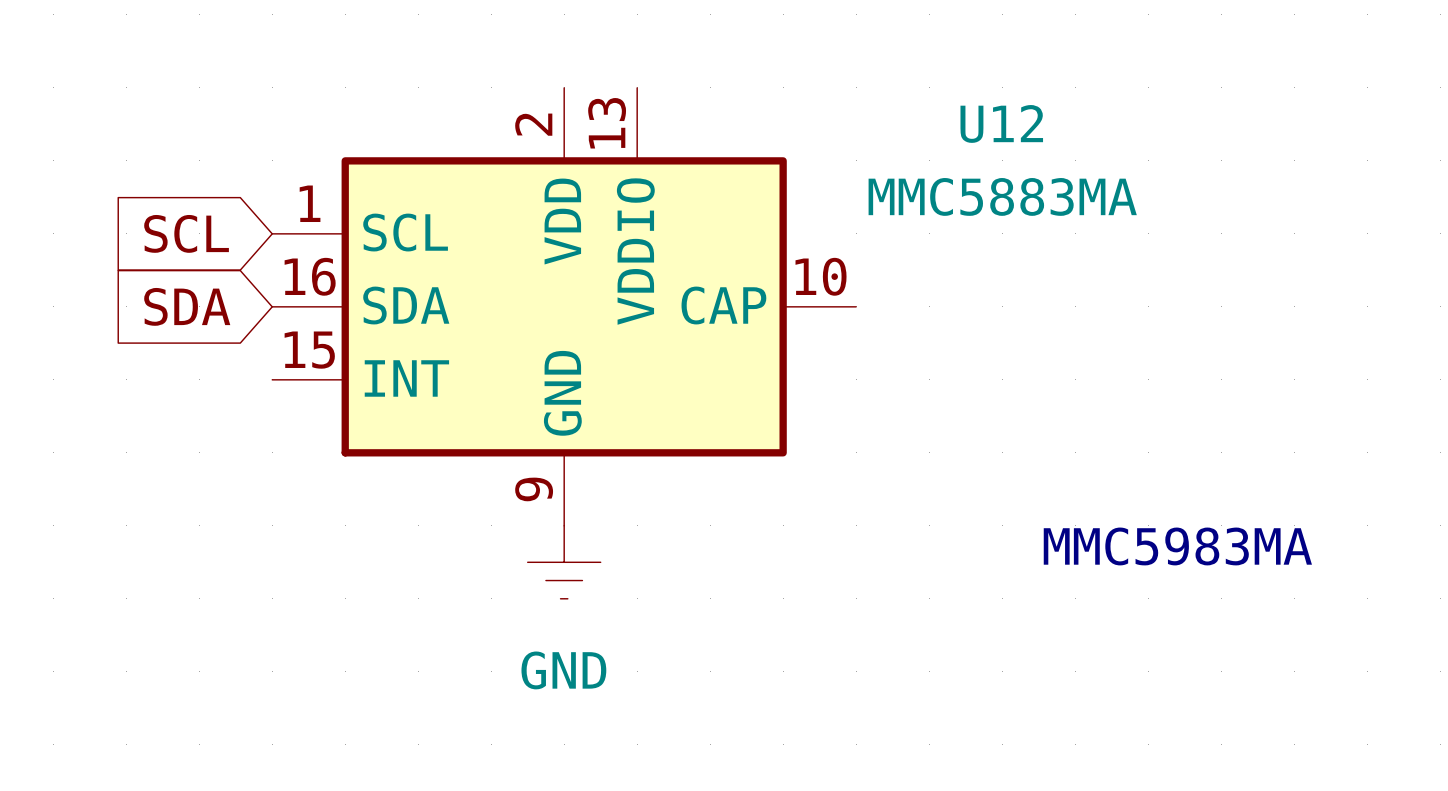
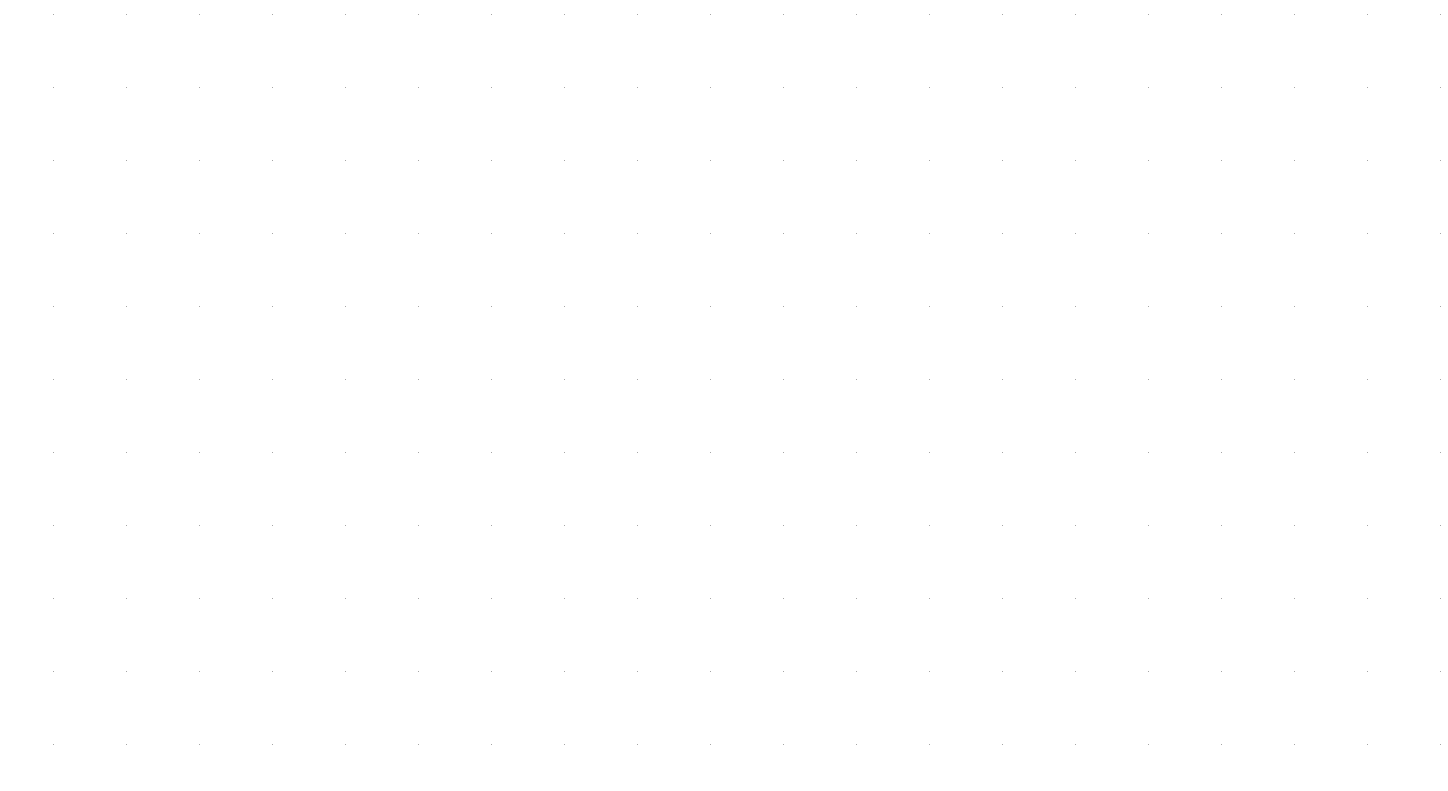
global label: SCL (186, 233) -> none
global label: SDA (187, 306) -> none
U12: MMC5883MA (564, 306) -> none
text: MMC5983MA (1177, 546) -> none
power symbol: GND (564, 562) -> none

